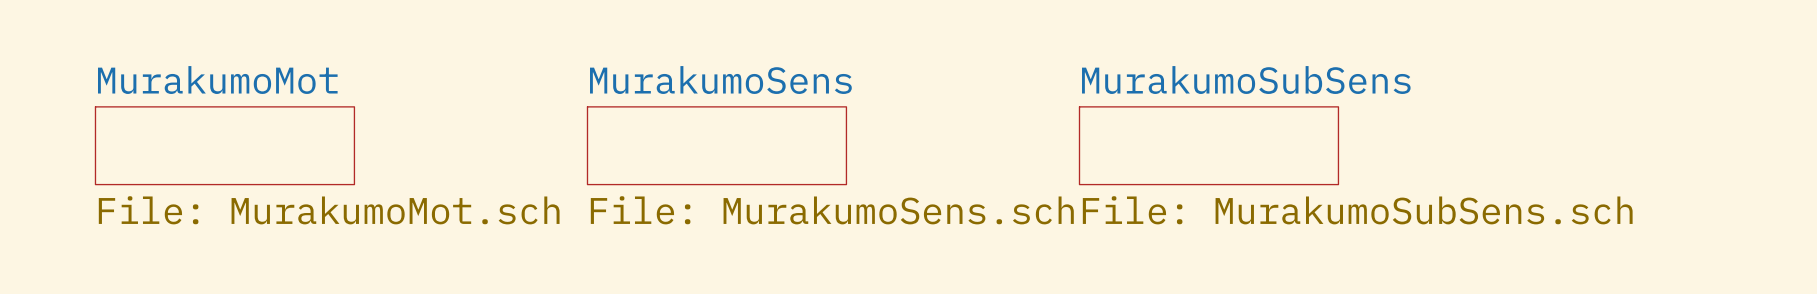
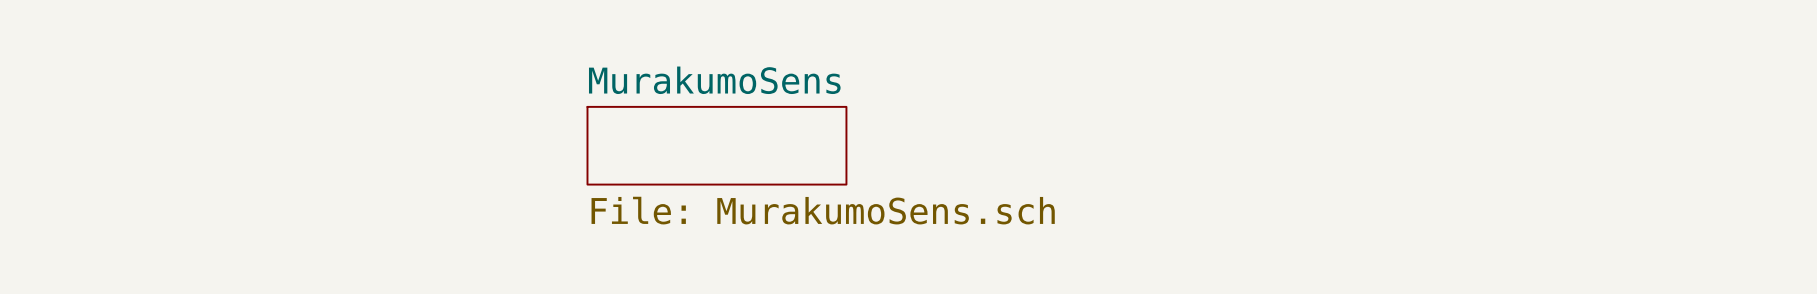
sheet MurakumoMot: File: MurakumoMot.sch (224, 145) -> none
sheet MurakumoSubSens: File: MurakumoSubSens.sch (1208, 145) -> none

